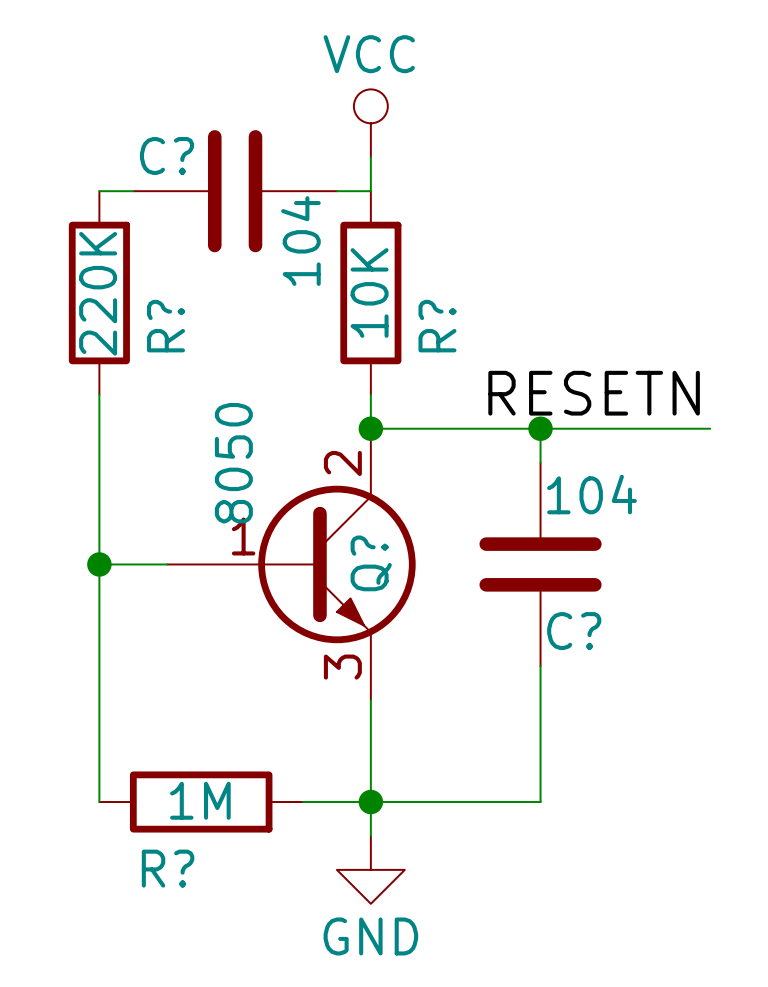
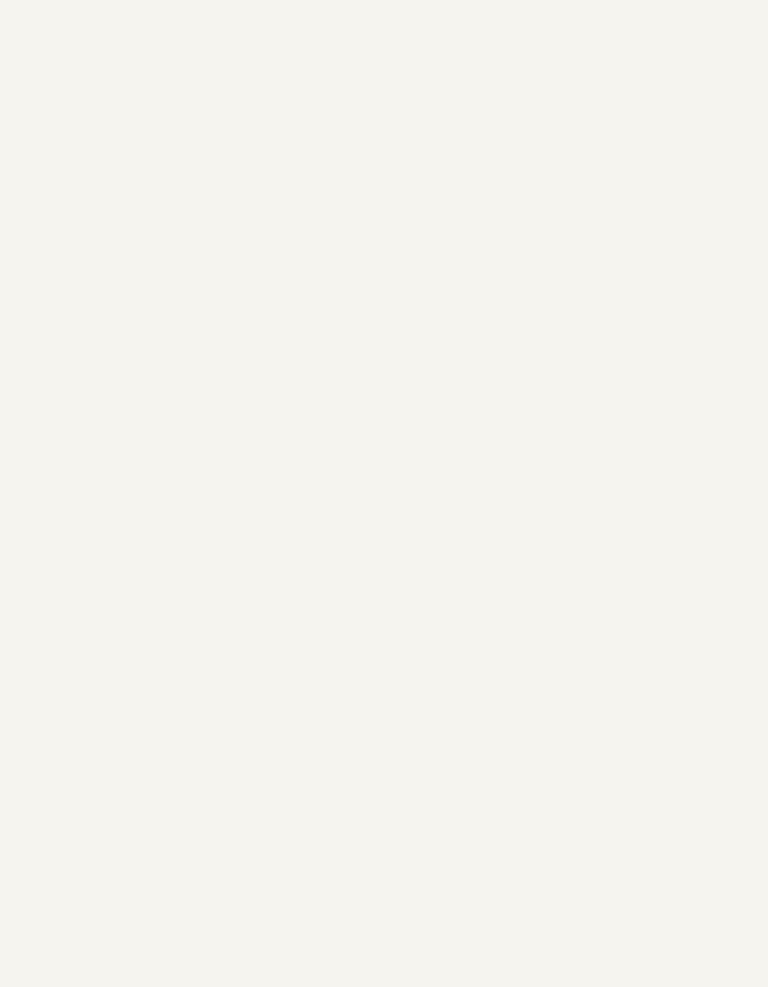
power symbol: VCC (370, 123) -> none
wire: (370, 157) (370, 191) (336, 191) -> none
wire: (99, 191) (133, 191) -> none
C?: 104 (235, 191) -> none
R?: 220K (99, 292) -> none
R?: 10K (370, 292) -> none
label: RESETN (594, 393) -> none
wire: (99, 394) (99, 802) -> none
wire: (370, 394) (370, 428) (710, 428) -> none
junction: (370, 428) -> none
wire: (540, 428) (540, 462) -> none
junction: (540, 428) -> none
wire: (99, 564) (167, 564) -> none
junction: (99, 564) -> none
Q?: 8050 (291, 564) -> none
C?: 104 (540, 564) -> none
wire: (540, 666) (540, 802) (302, 802) -> none
wire: (370, 700) (370, 835) -> none
R?: 1M (201, 802) -> none
junction: (370, 802) -> none
power symbol: GND (370, 869) -> none

